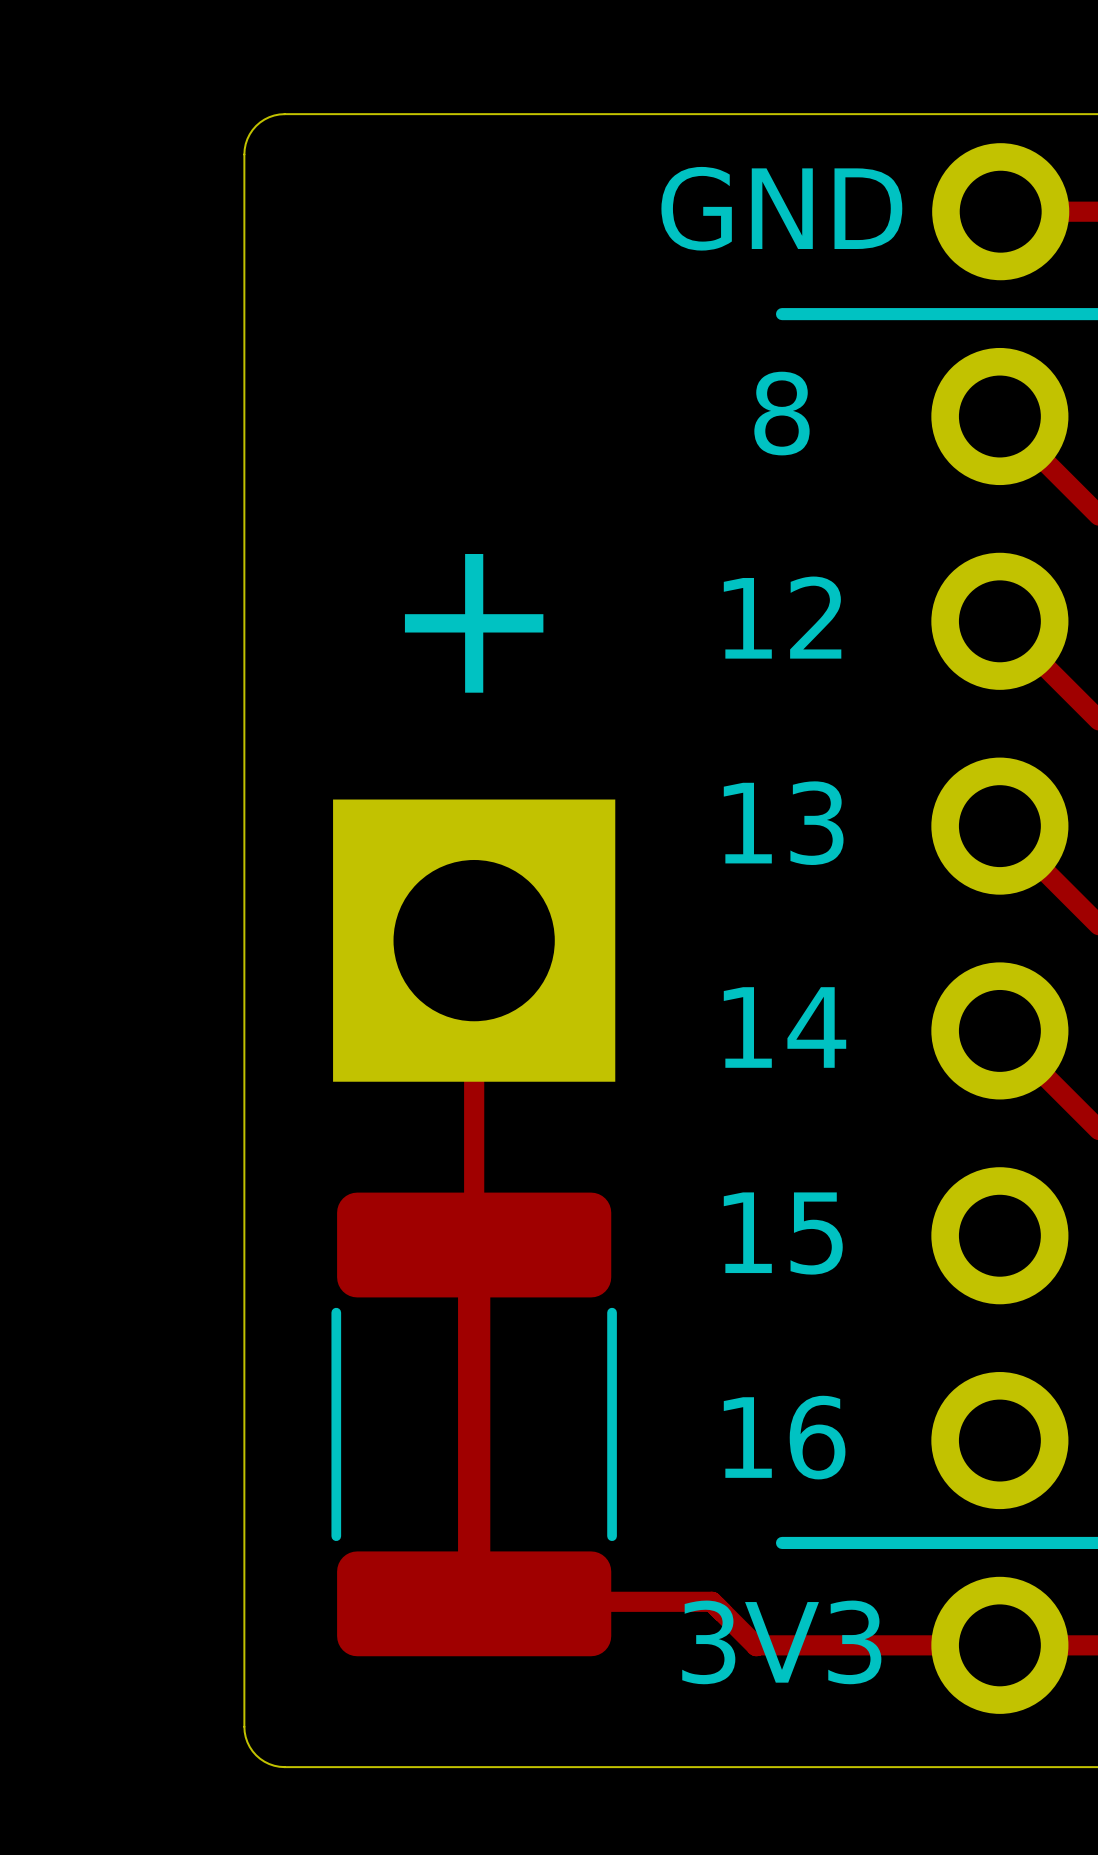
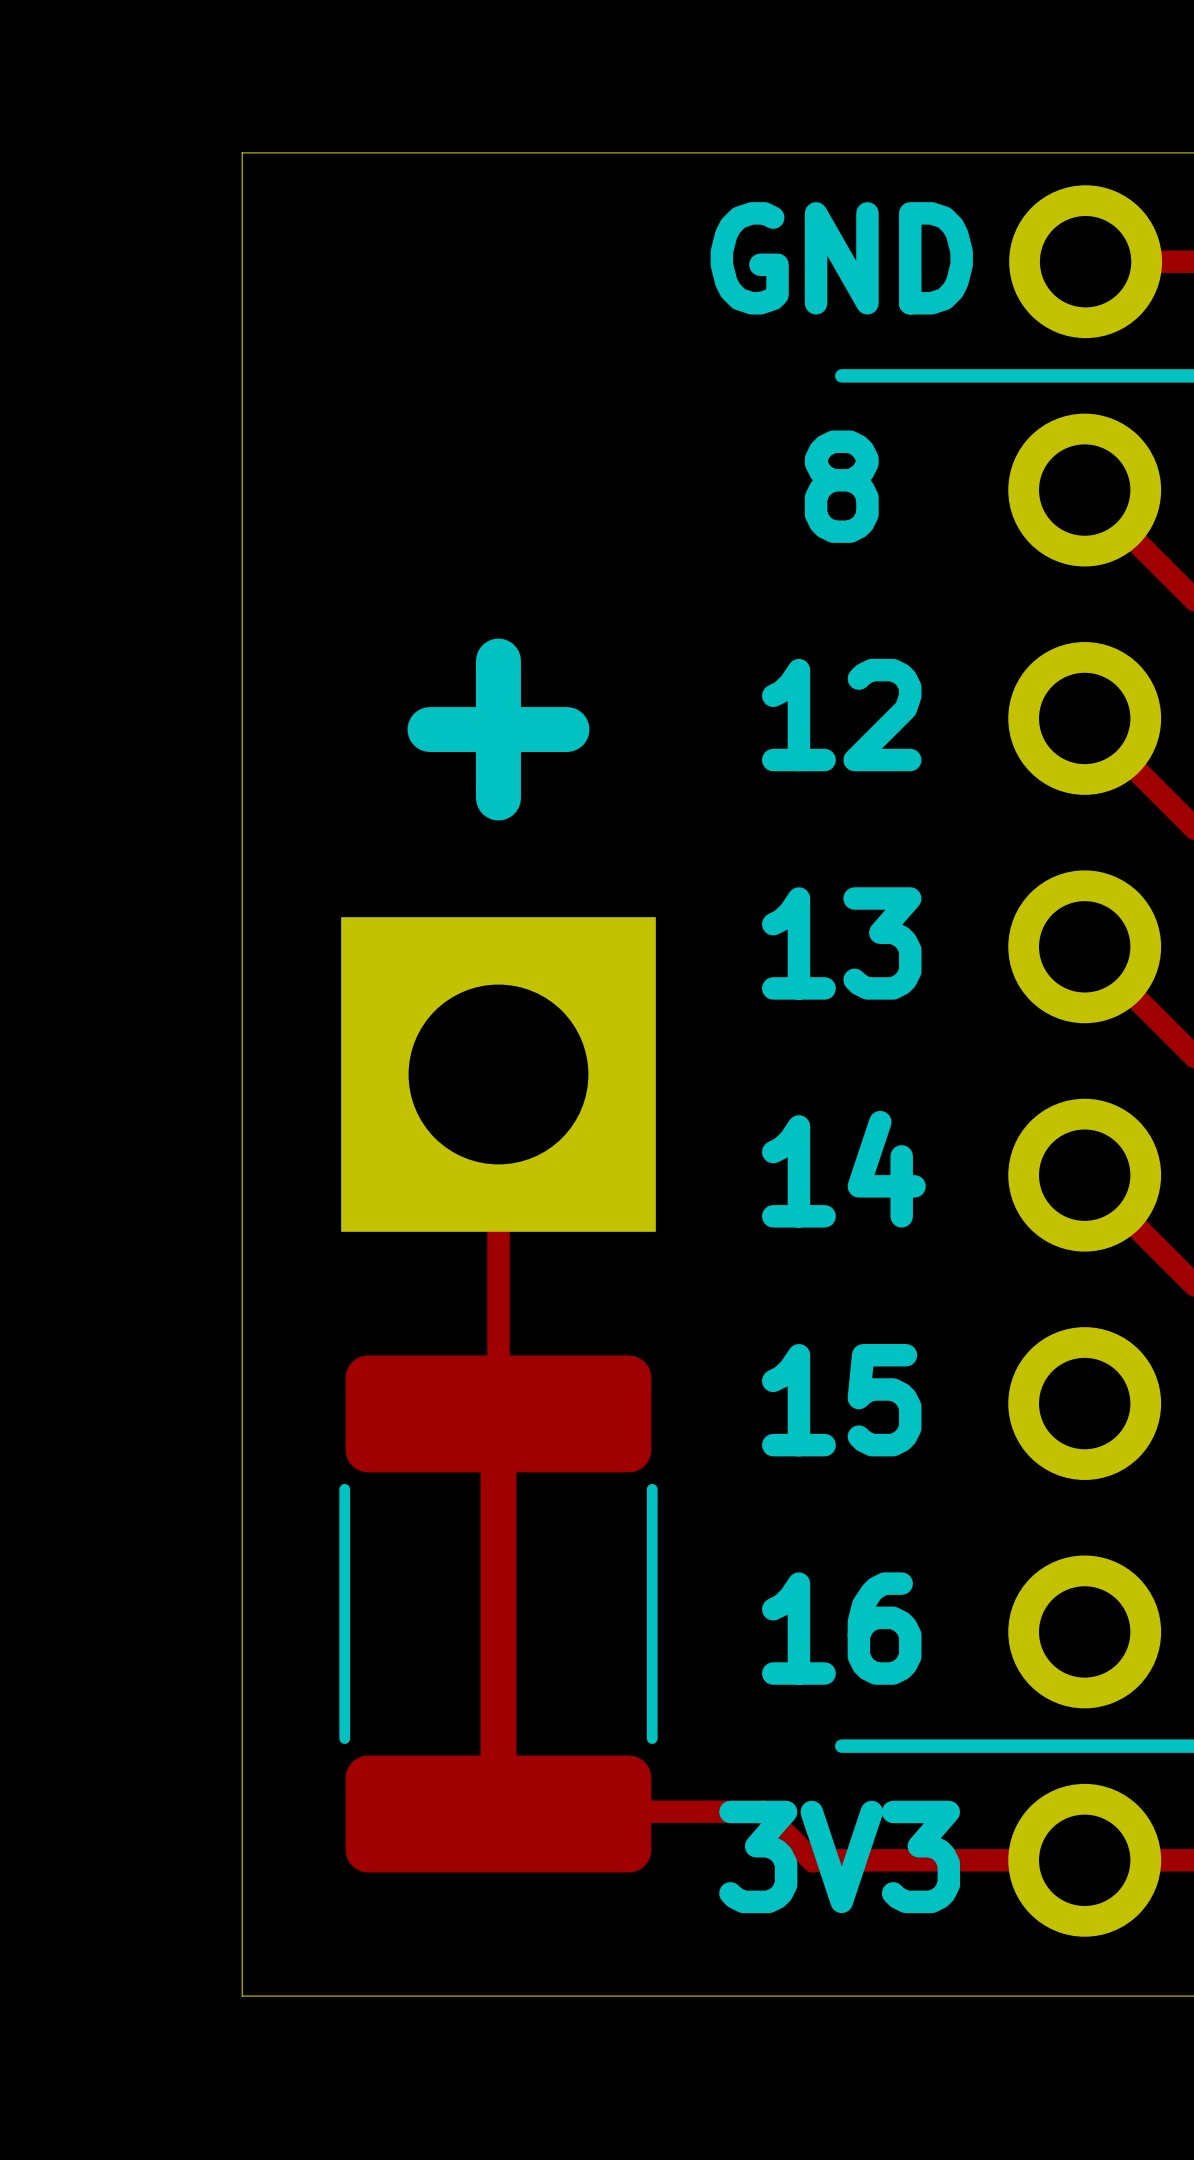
board edge: (284, 114) (269, 117) (256, 125) (247, 139) (244, 154) -> (287, 152) (242, 152) (242, 197)
board edge: (244, 1726) (247, 1742) (256, 1755) (269, 1764) (284, 1767) -> (242, 1951) (242, 1996) (287, 1996)

